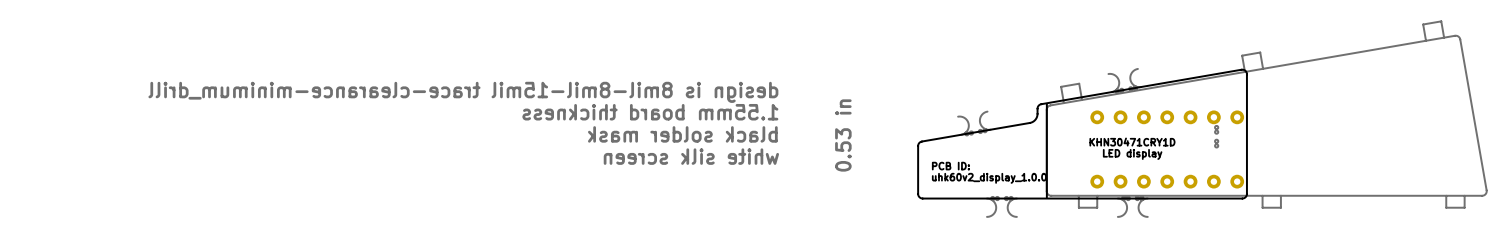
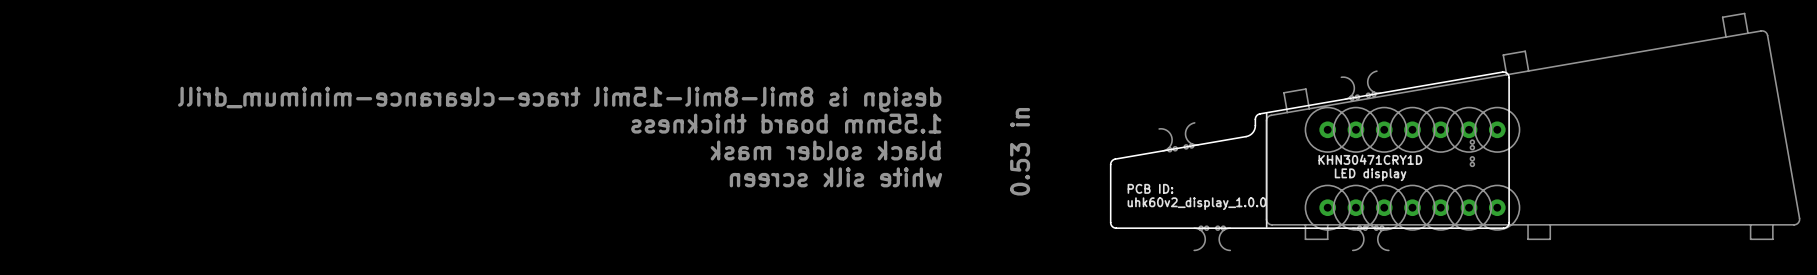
part footprint: [1046, 20, 1488, 209] -> [1265, 12, 1801, 240]

